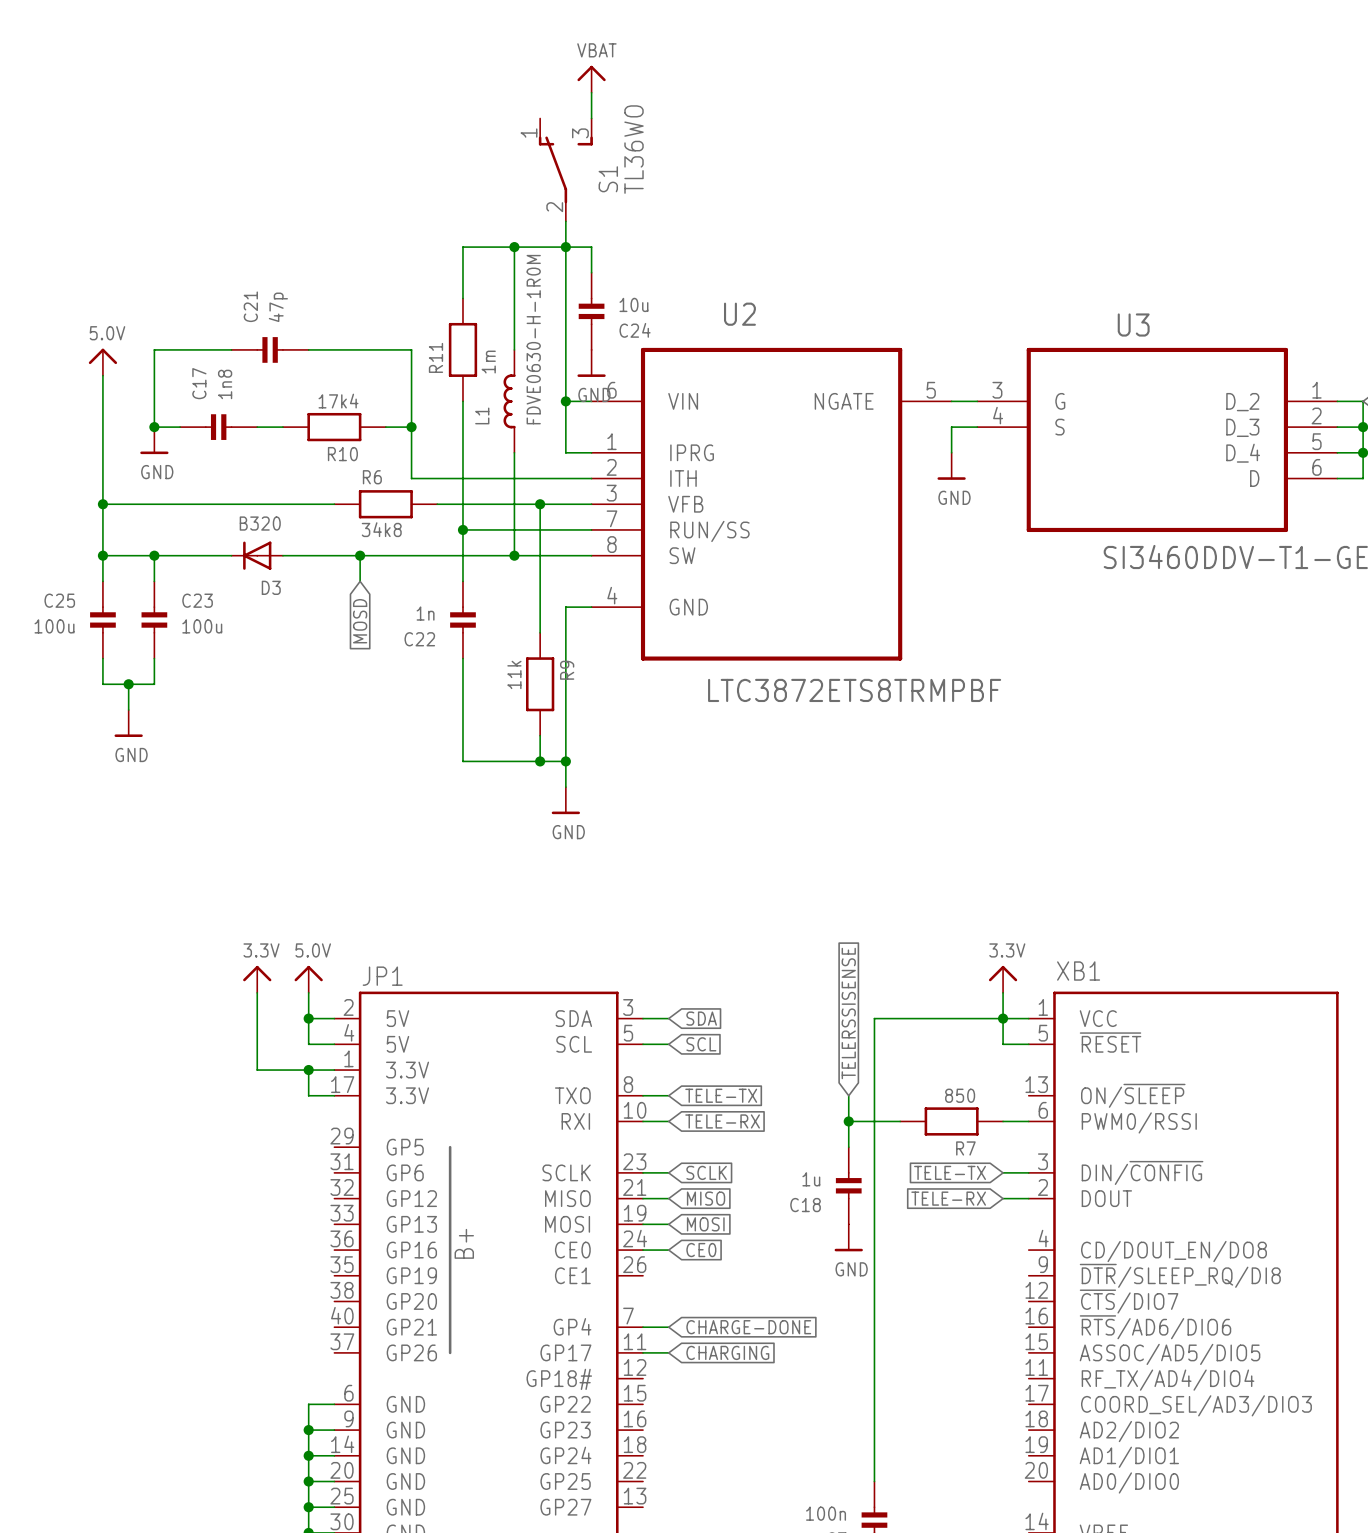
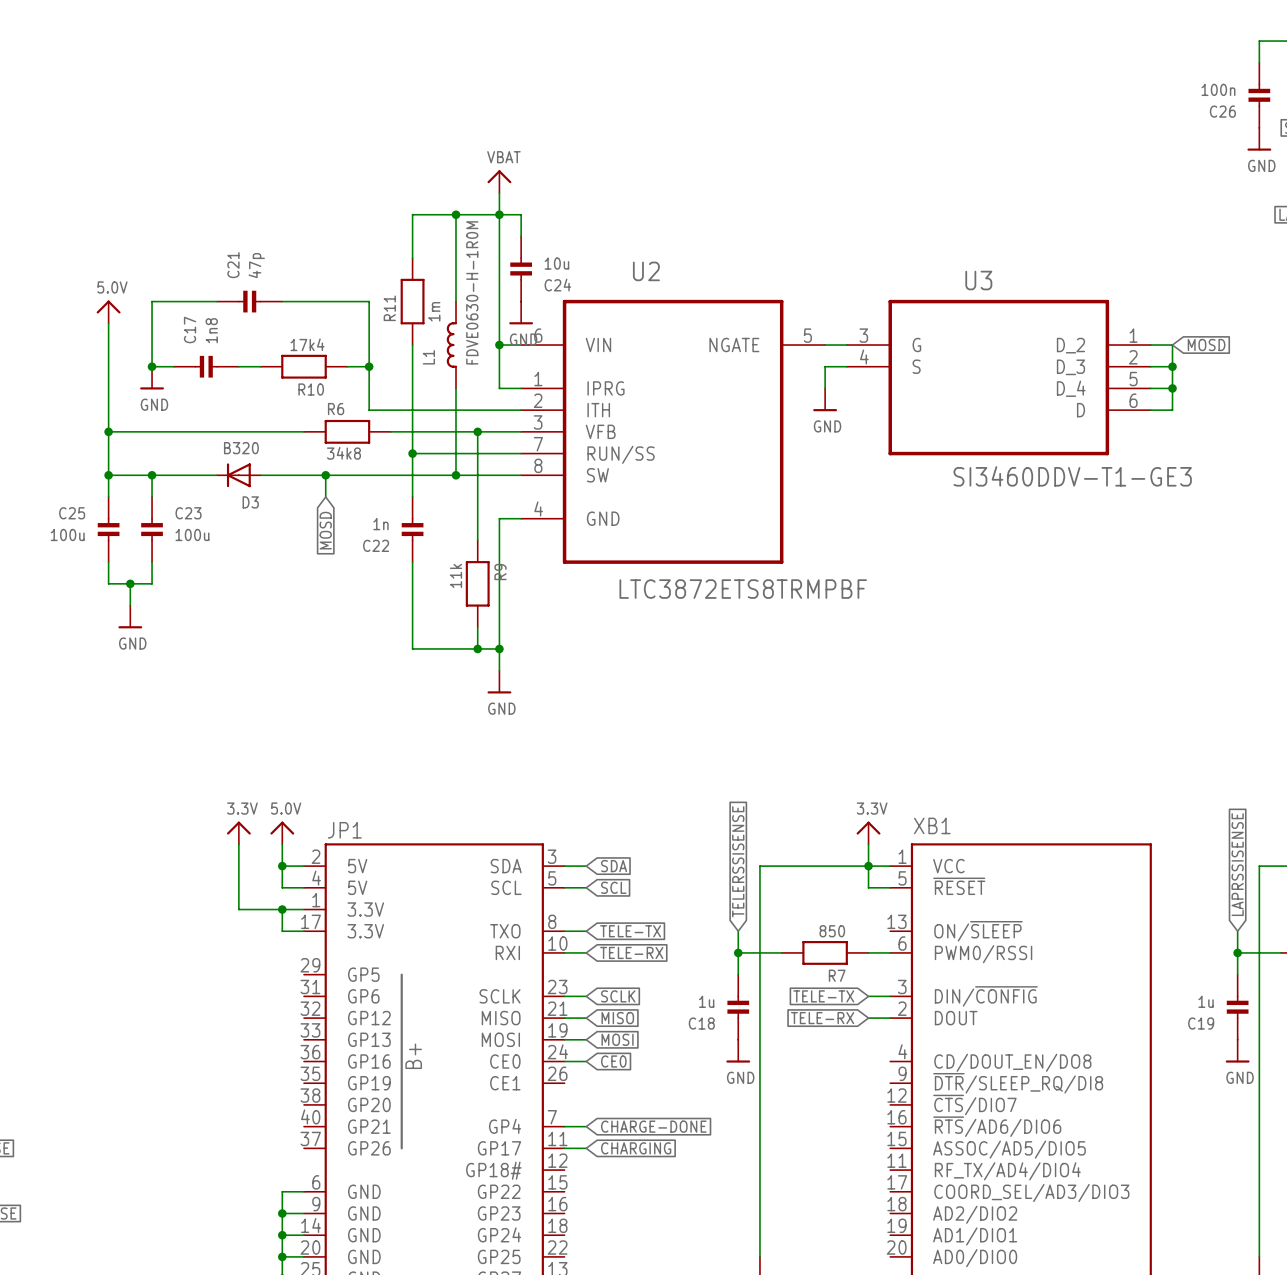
power symbol position: VBAT (591, 79) -> VBAT (499, 181)
wire: (591, 92) (591, 118) -> none
S1: TL36WO (565, 169) -> none

